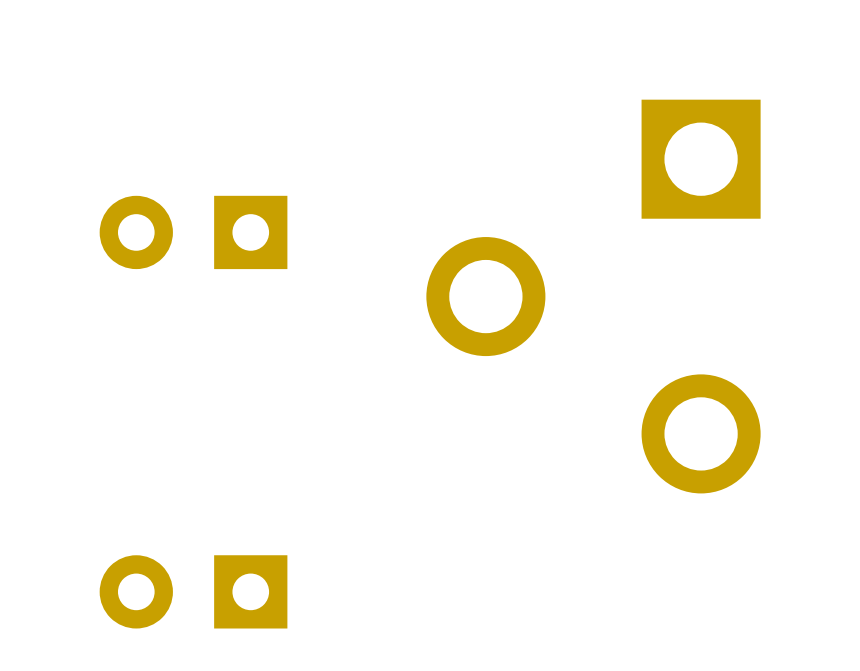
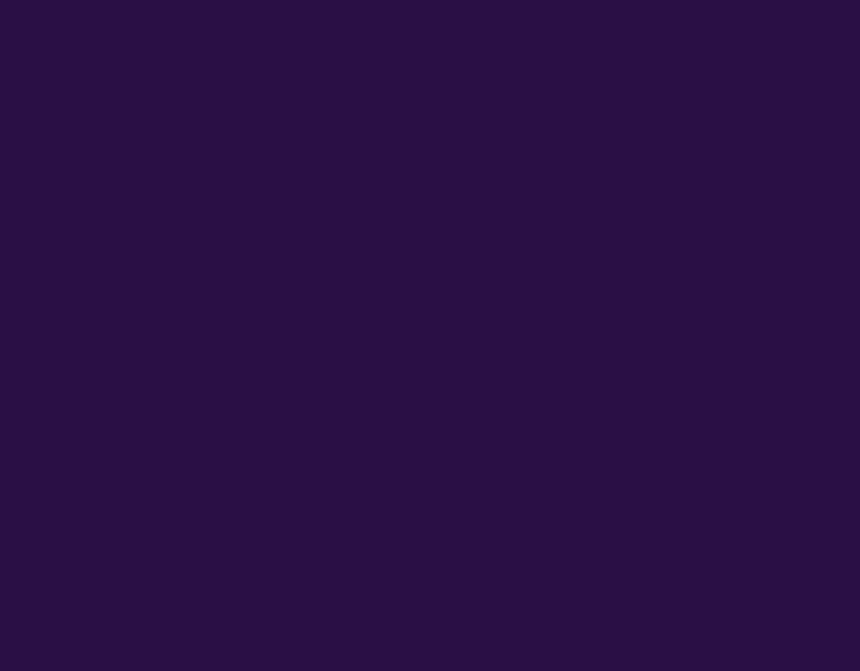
part: (193, 232) -> none
part: (593, 296) -> none
part: (193, 591) -> none

